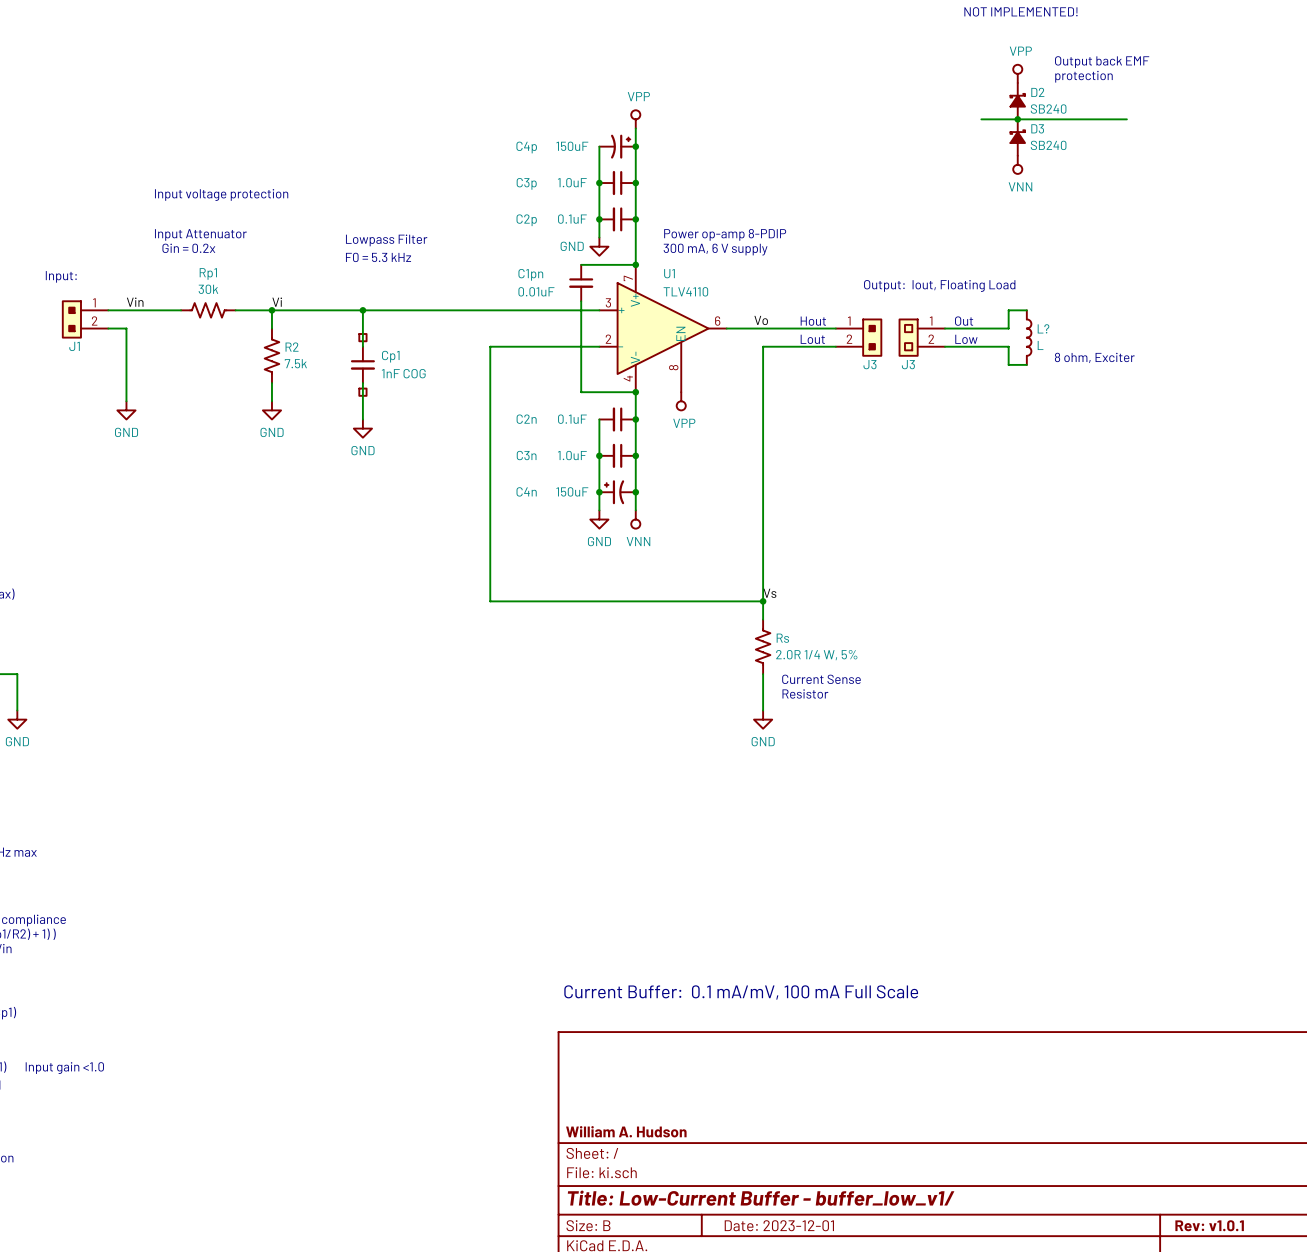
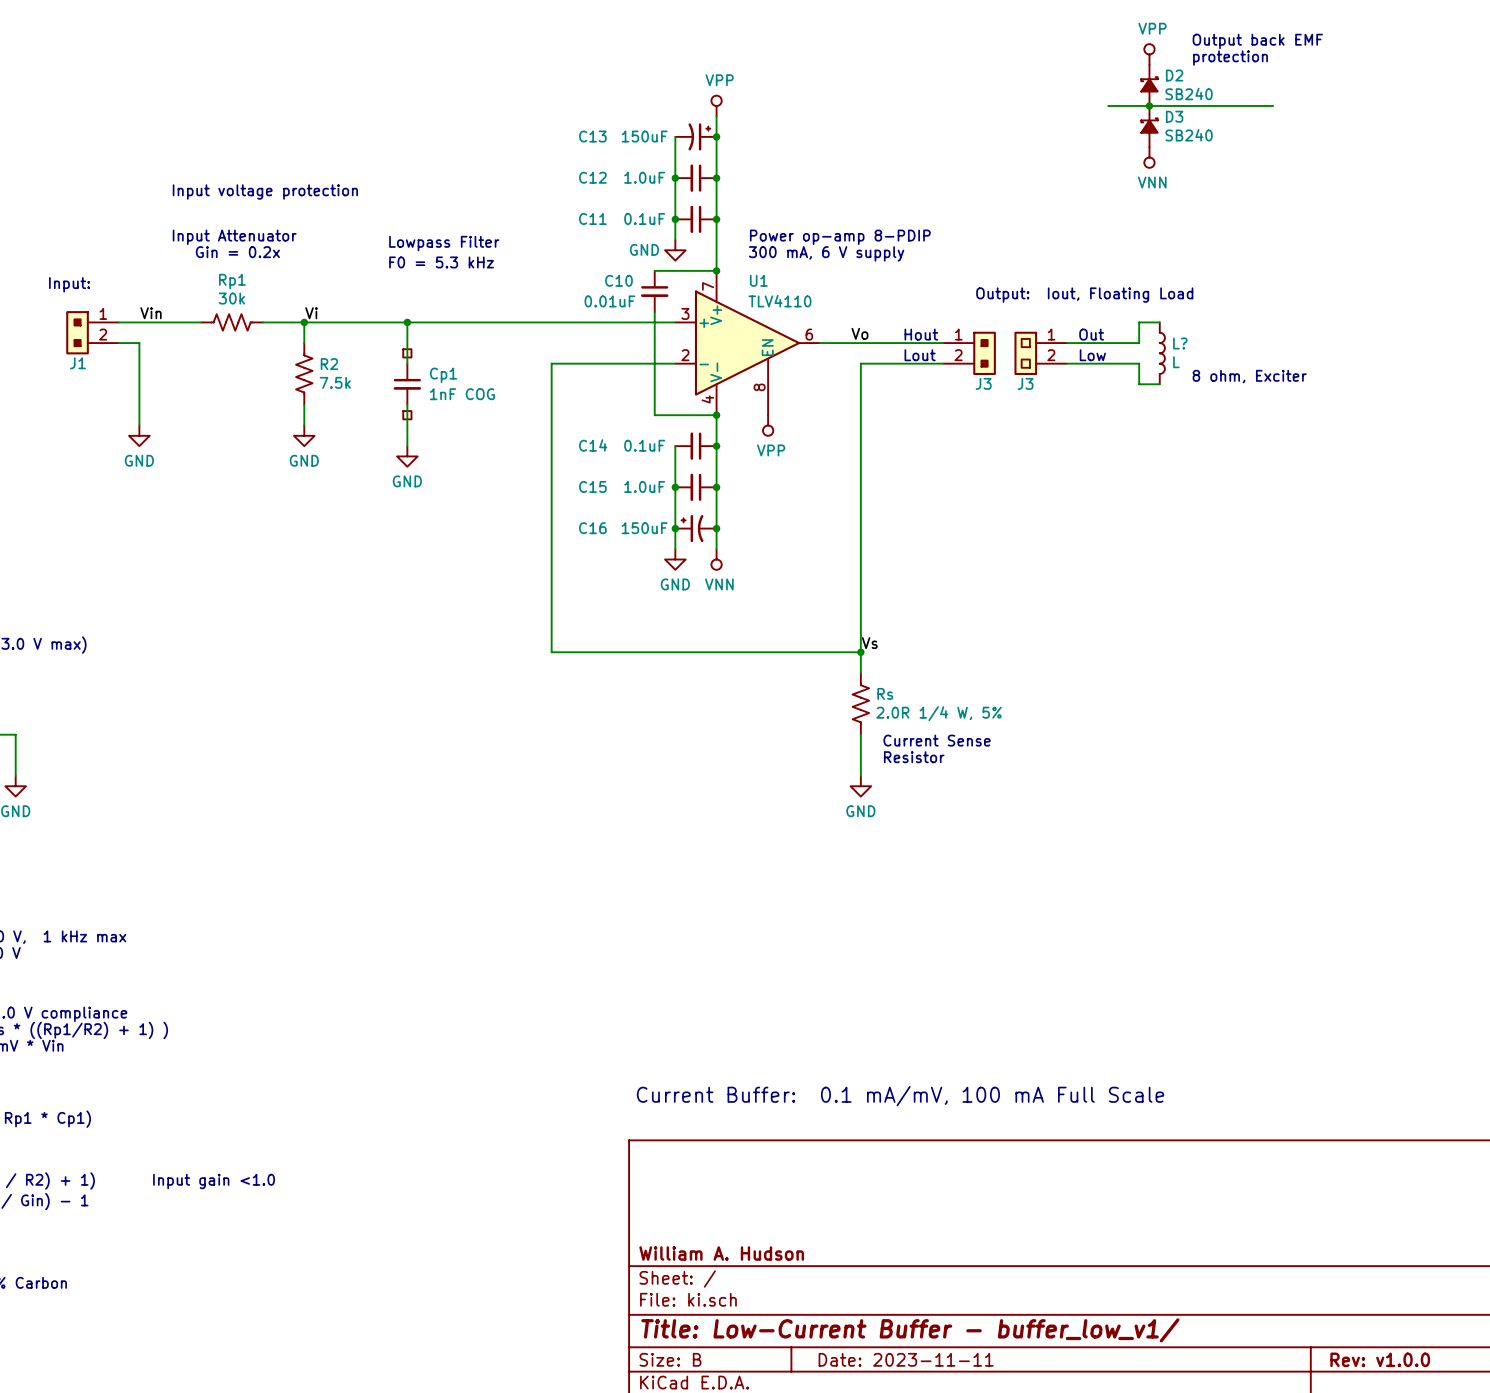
C4p name: C4p (526, 147) -> C13 (592, 136)
C3p name: C3p (526, 183) -> C12 (592, 177)
C2p name: C2p (526, 220) -> C11 (592, 218)
C1pn name: C1pn (530, 274) -> C10 (618, 280)
C2n name: C2n (526, 419) -> C14 (593, 445)
C3n name: C3n (526, 455) -> C15 (592, 486)
C4n name: C4n (526, 491) -> C16 (592, 528)
title block: Date: 2023-12-01 (779, 1225) -> Date: 2023-11-11 (906, 1359)
title block: Rev: v1.0.1 (1209, 1225) -> Rev: v1.0.0 (1380, 1359)

